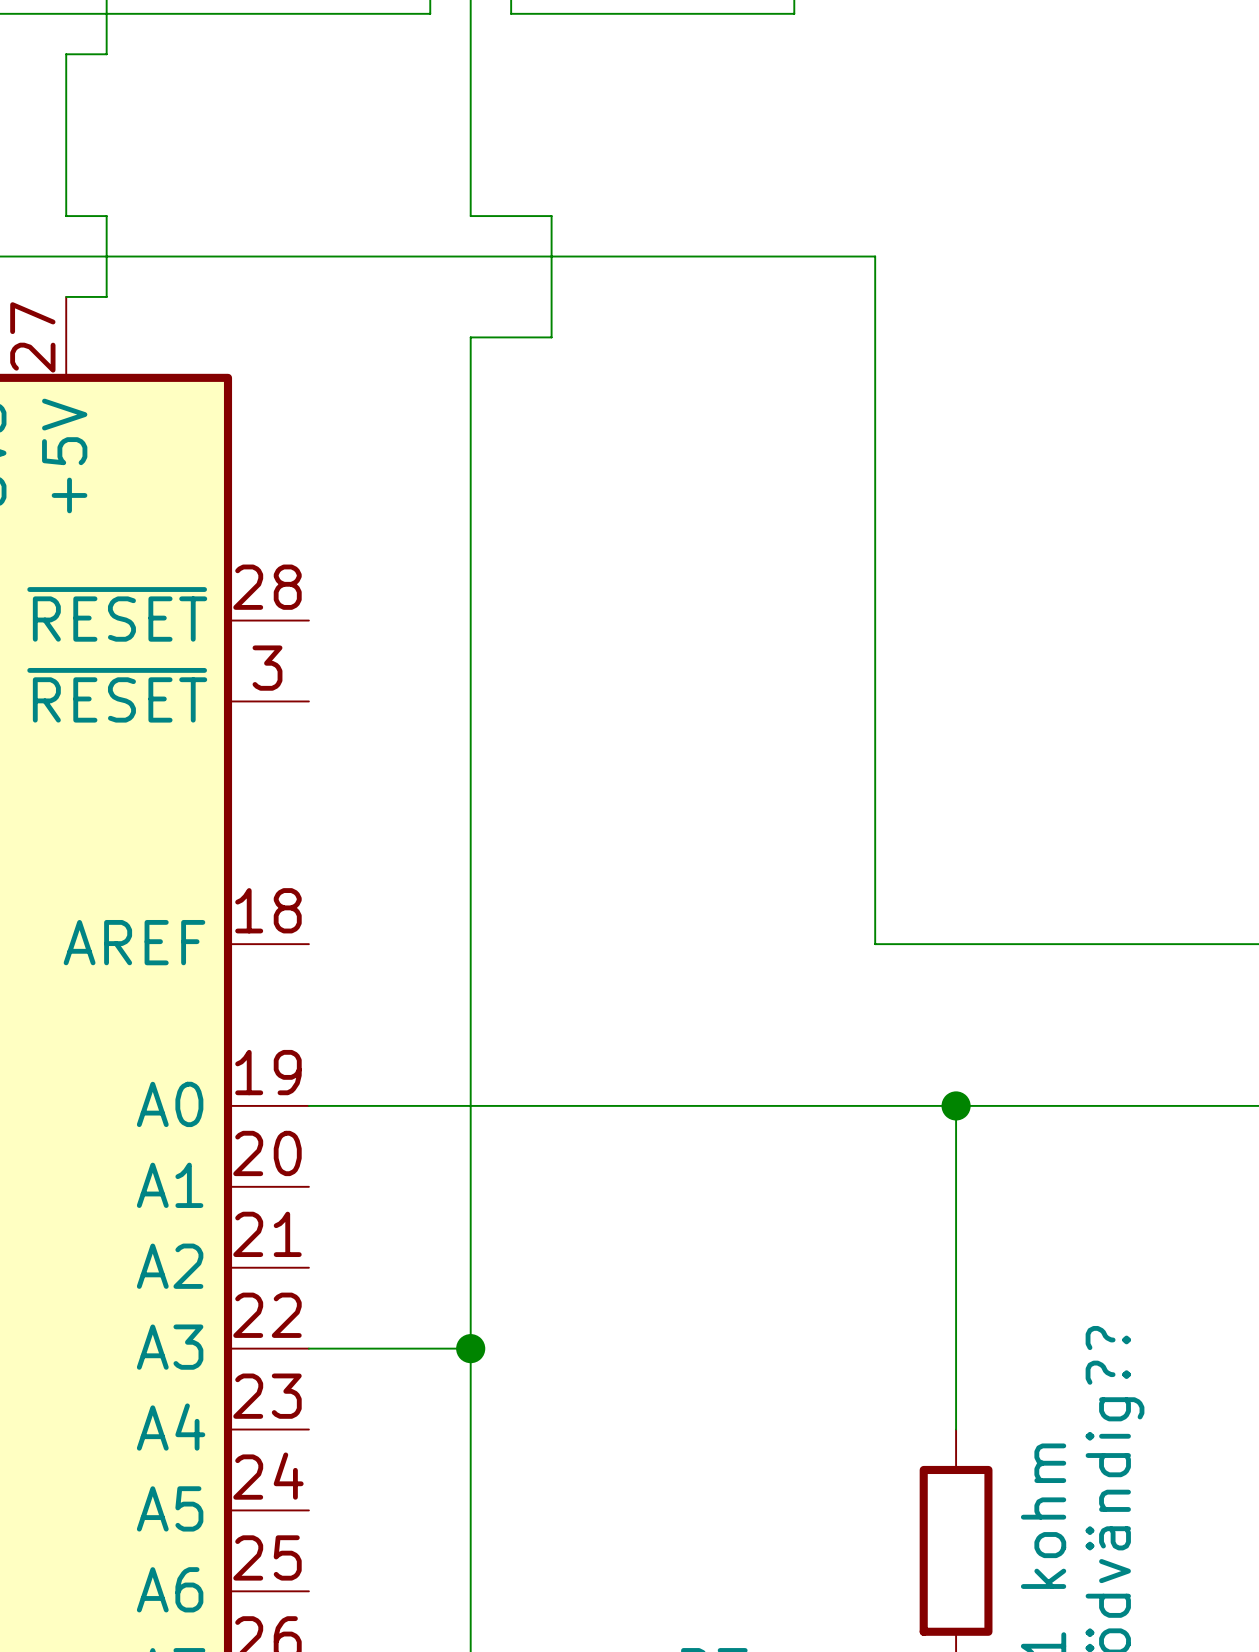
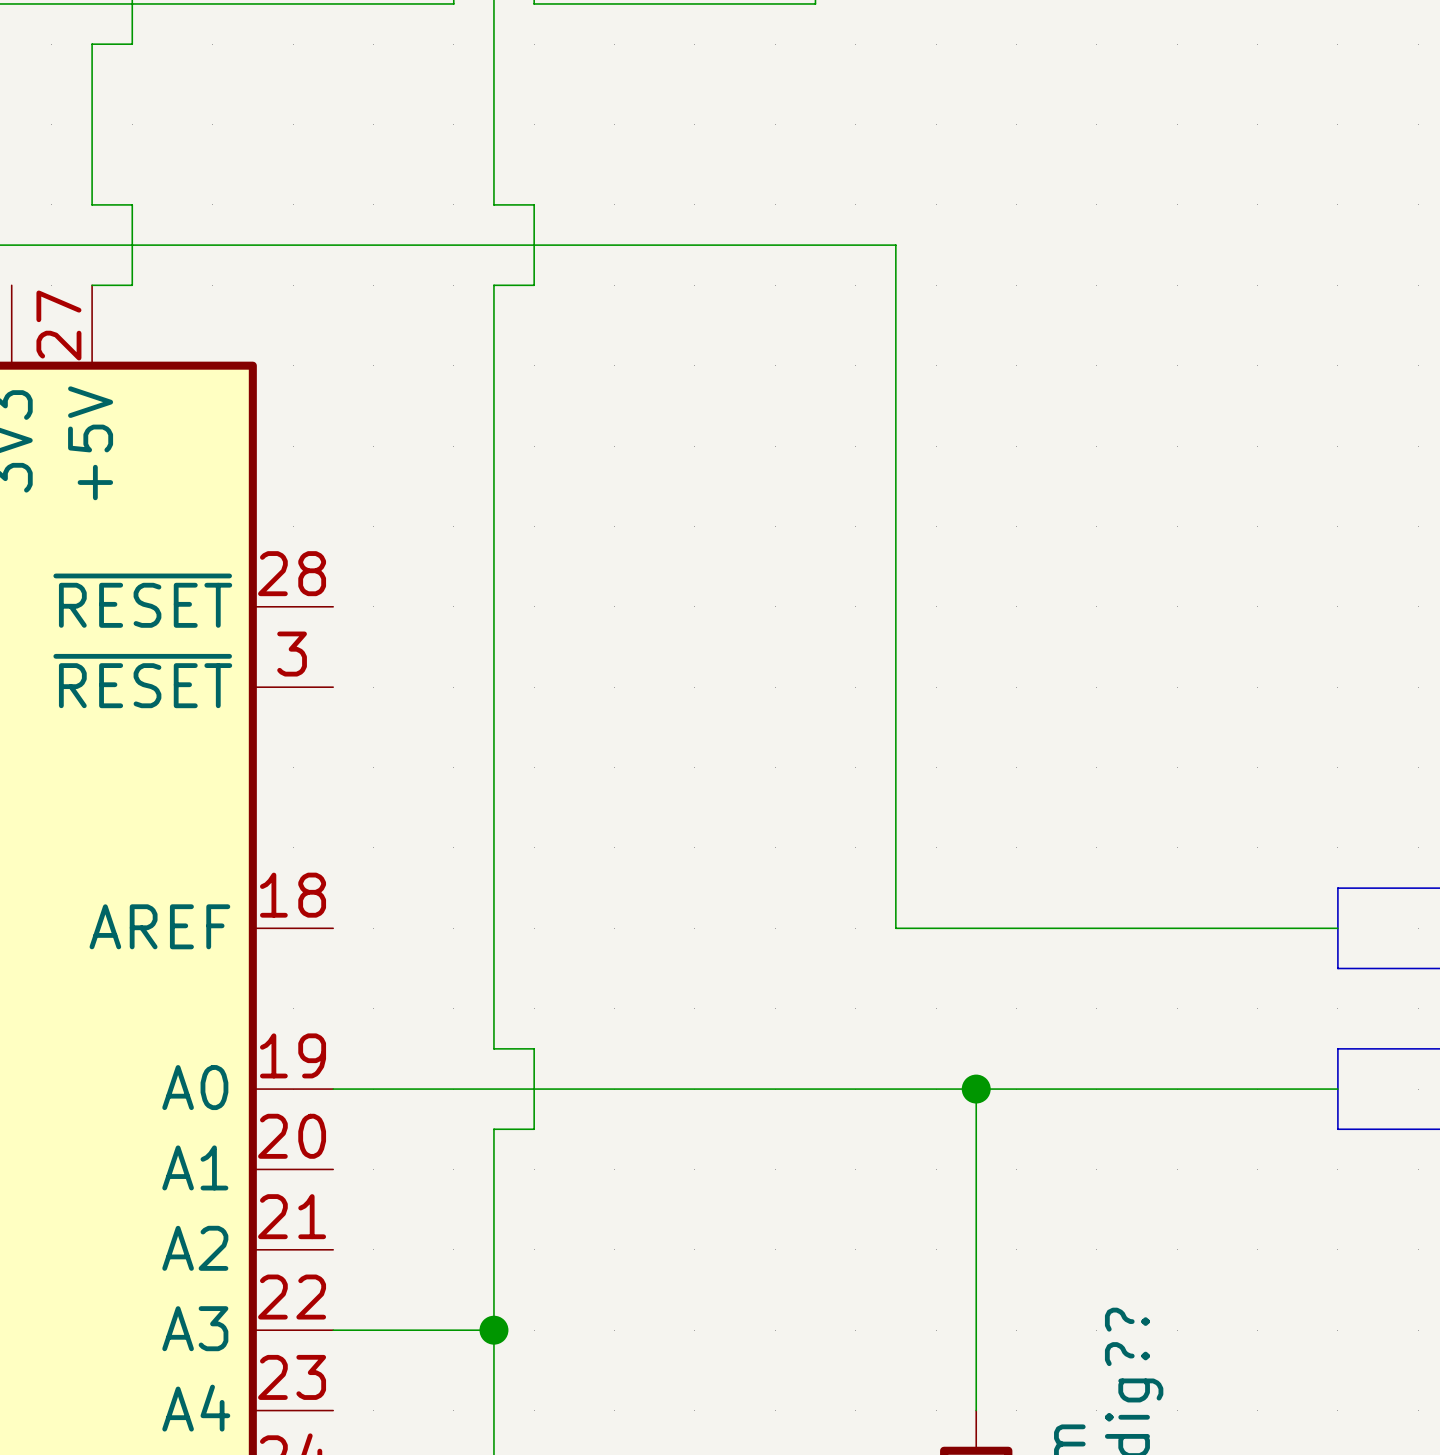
wire: (511, 216) (551, 216) (551, 337) (470, 337) -> (534, 204) (534, 285) (493, 285) (493, 325)
wire: (470, 1065) (470, 1146) -> (493, 1048) (534, 1048) (534, 1129) (493, 1129)

